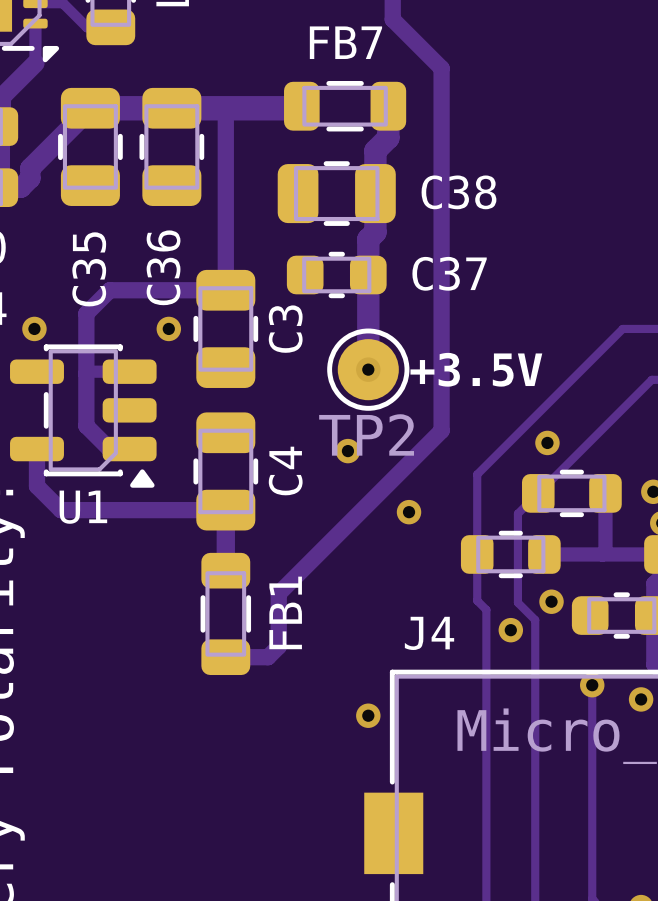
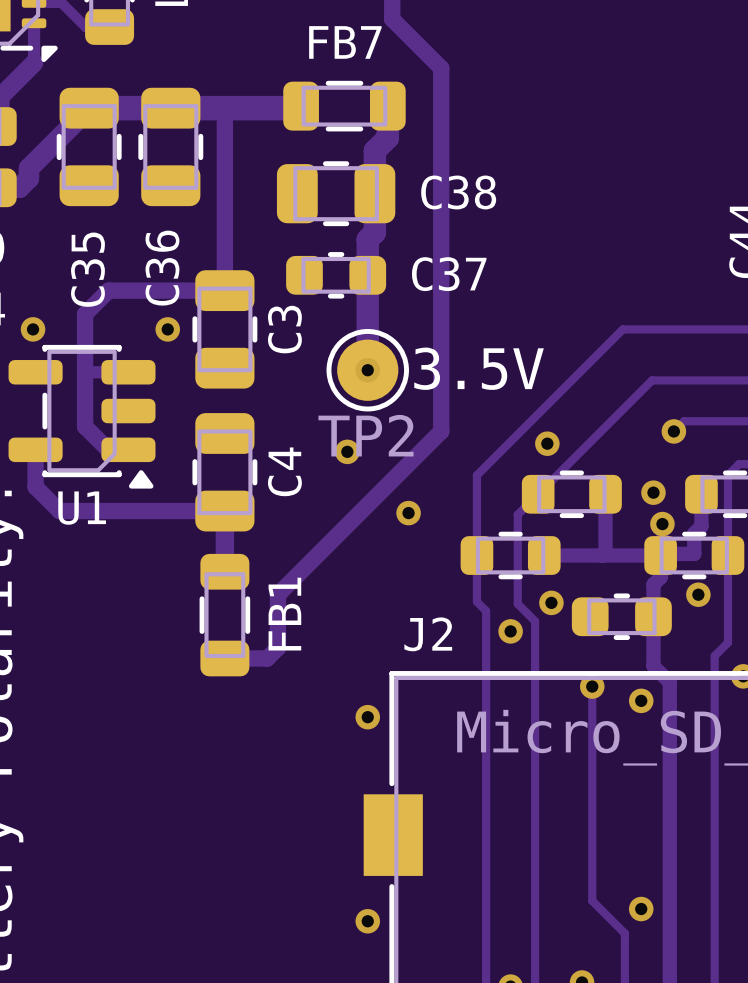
TP2 text: none -> 3.5V (479, 368)
text: +3.5V (476, 369) -> none
J4 name: J4 (429, 633) -> J2 (428, 634)

